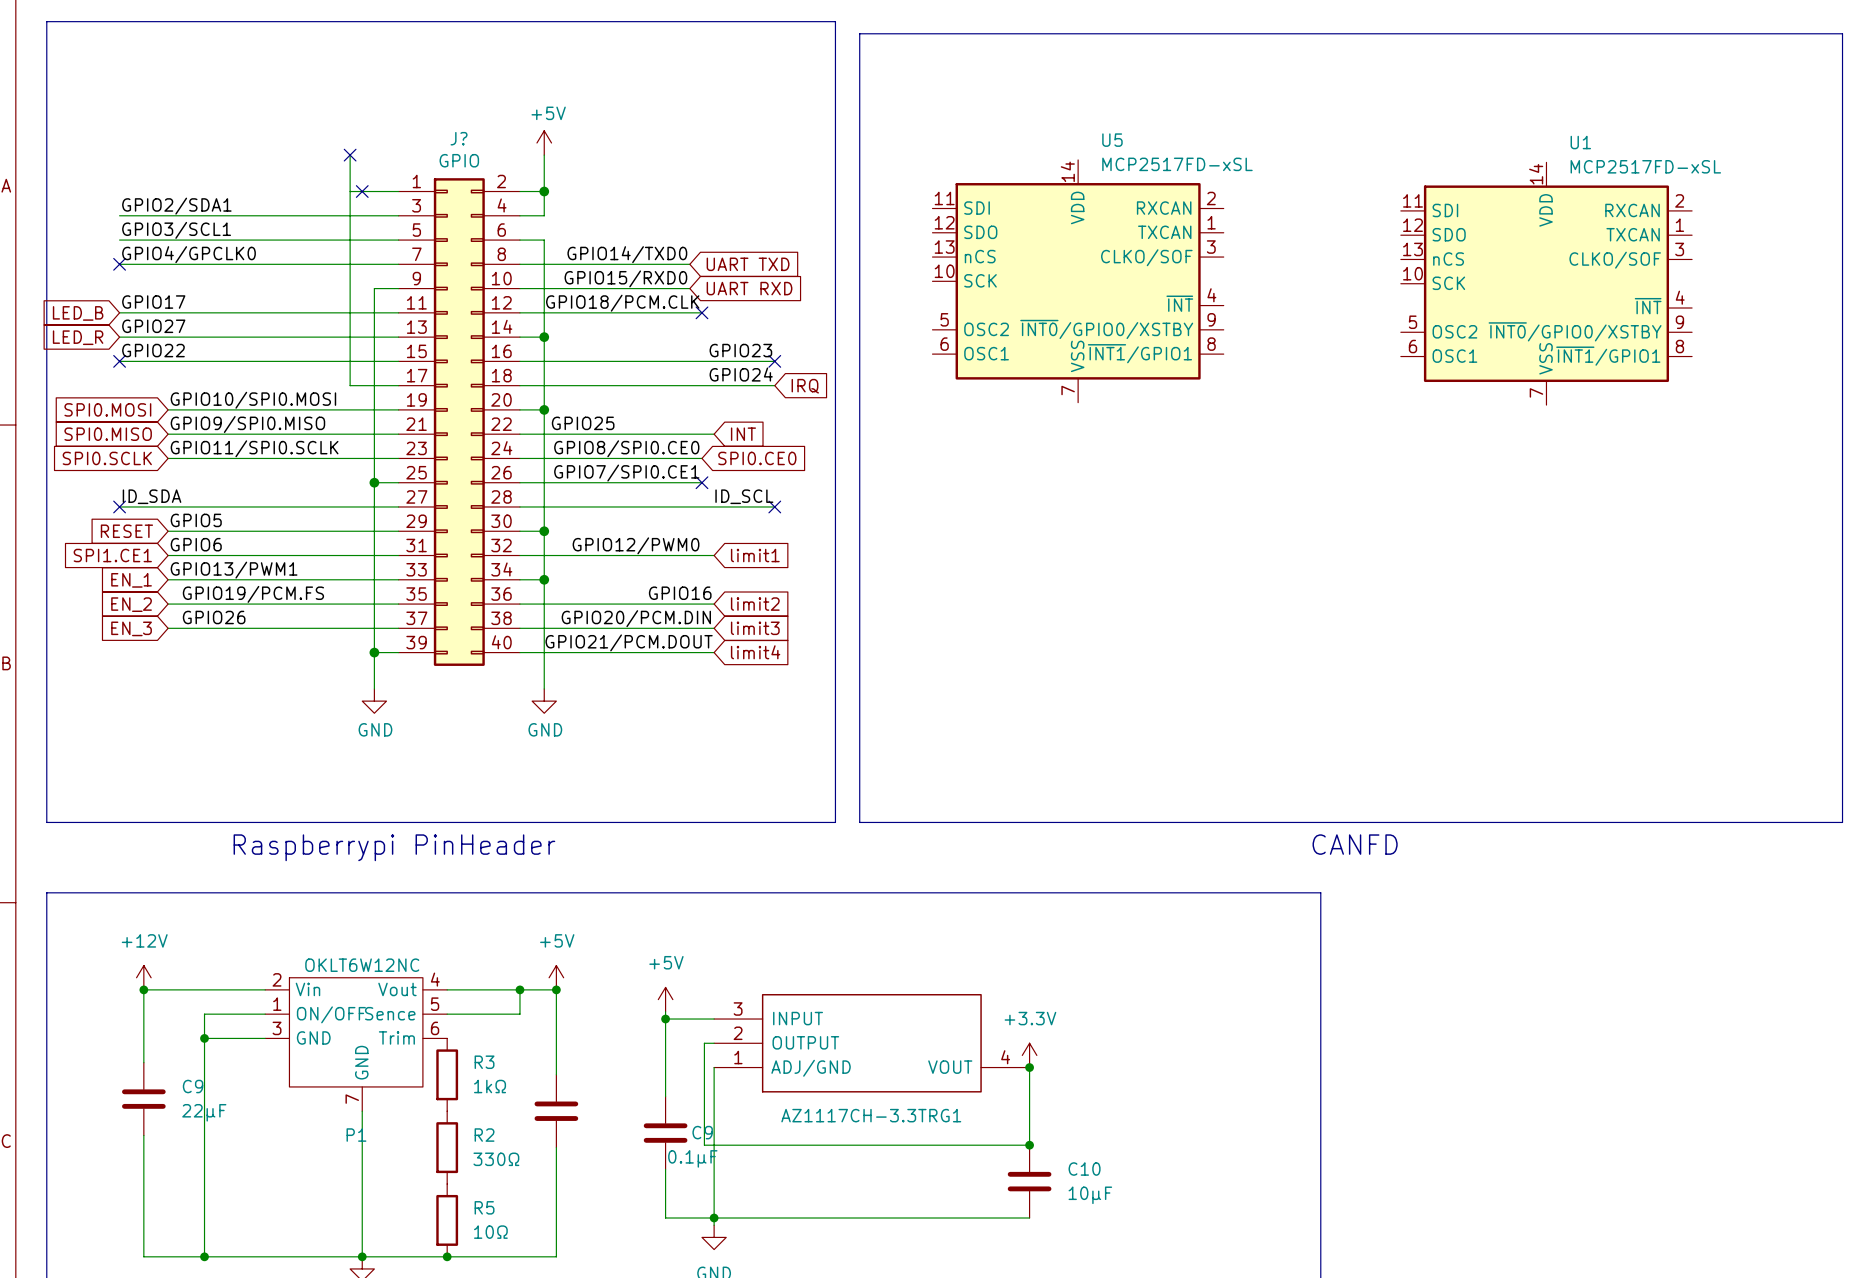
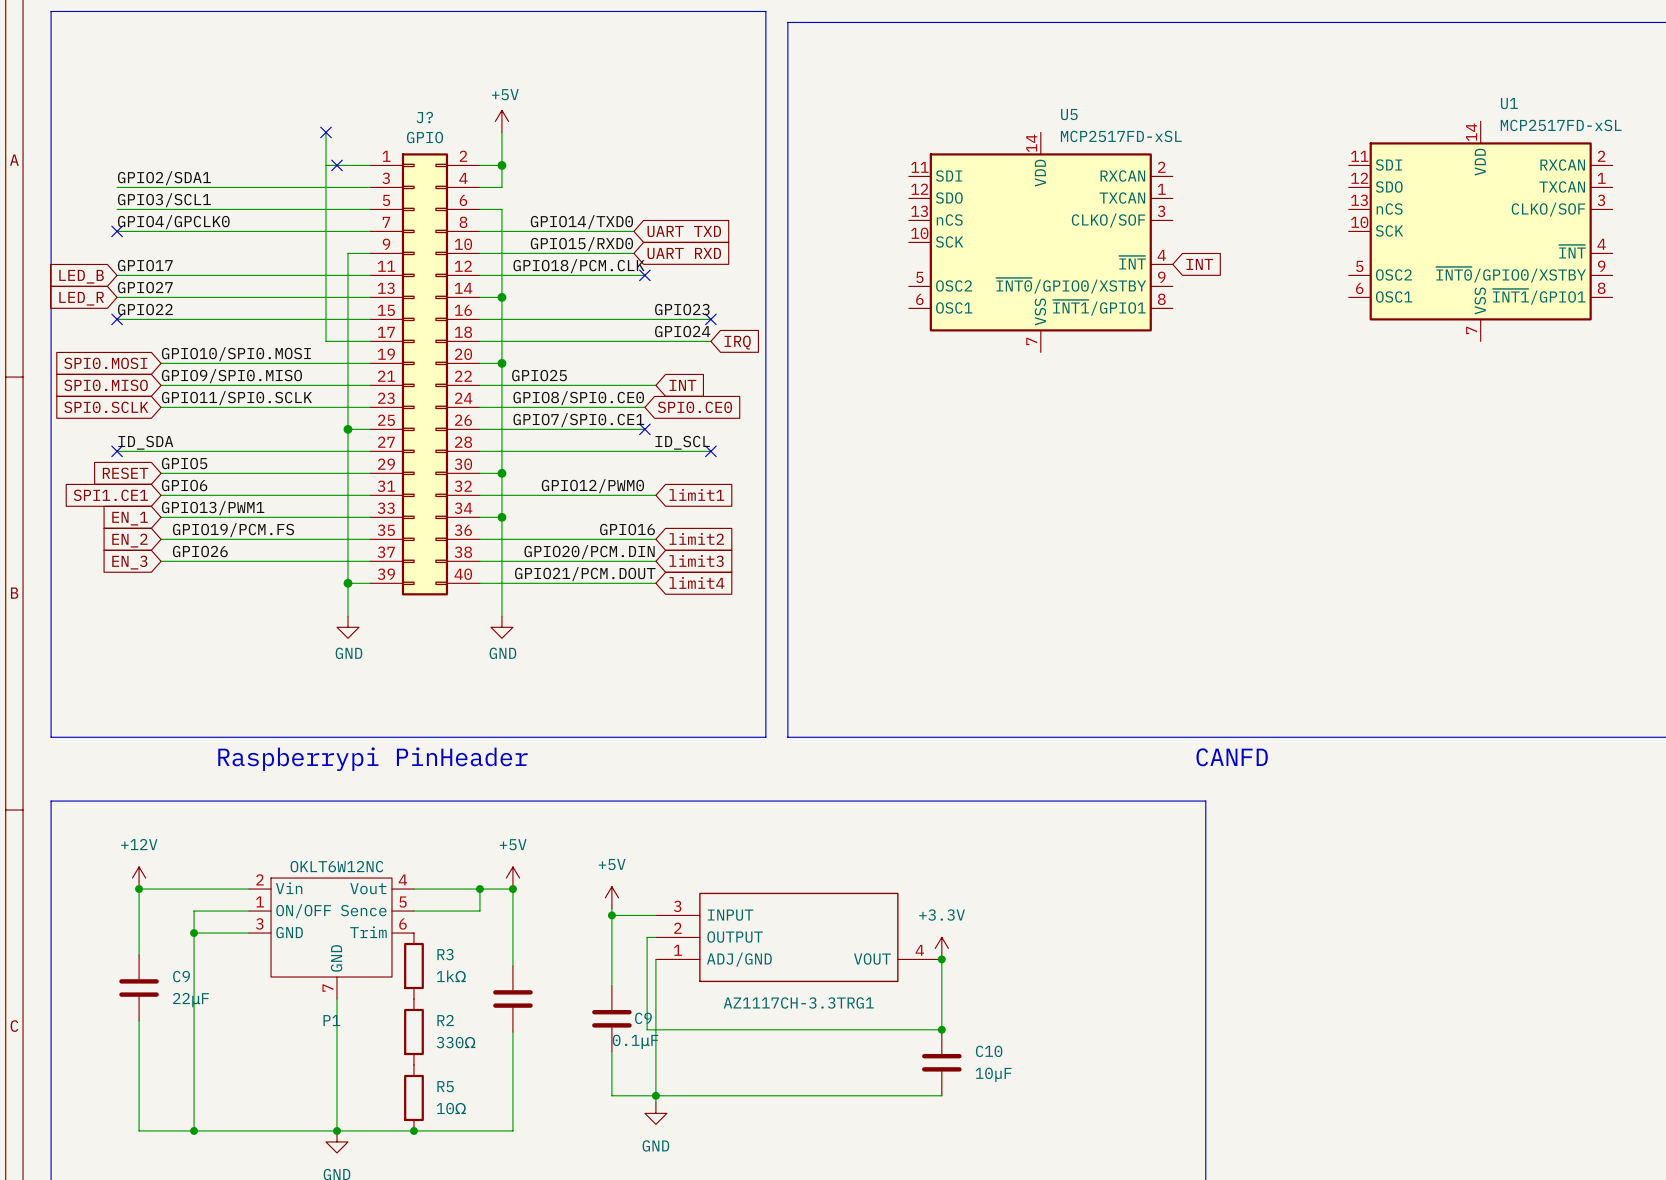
U5 position: (1078, 281) -> (1040, 242)
U1 position: (1546, 283) -> (1480, 231)
global label: none -> INT (1199, 264)

